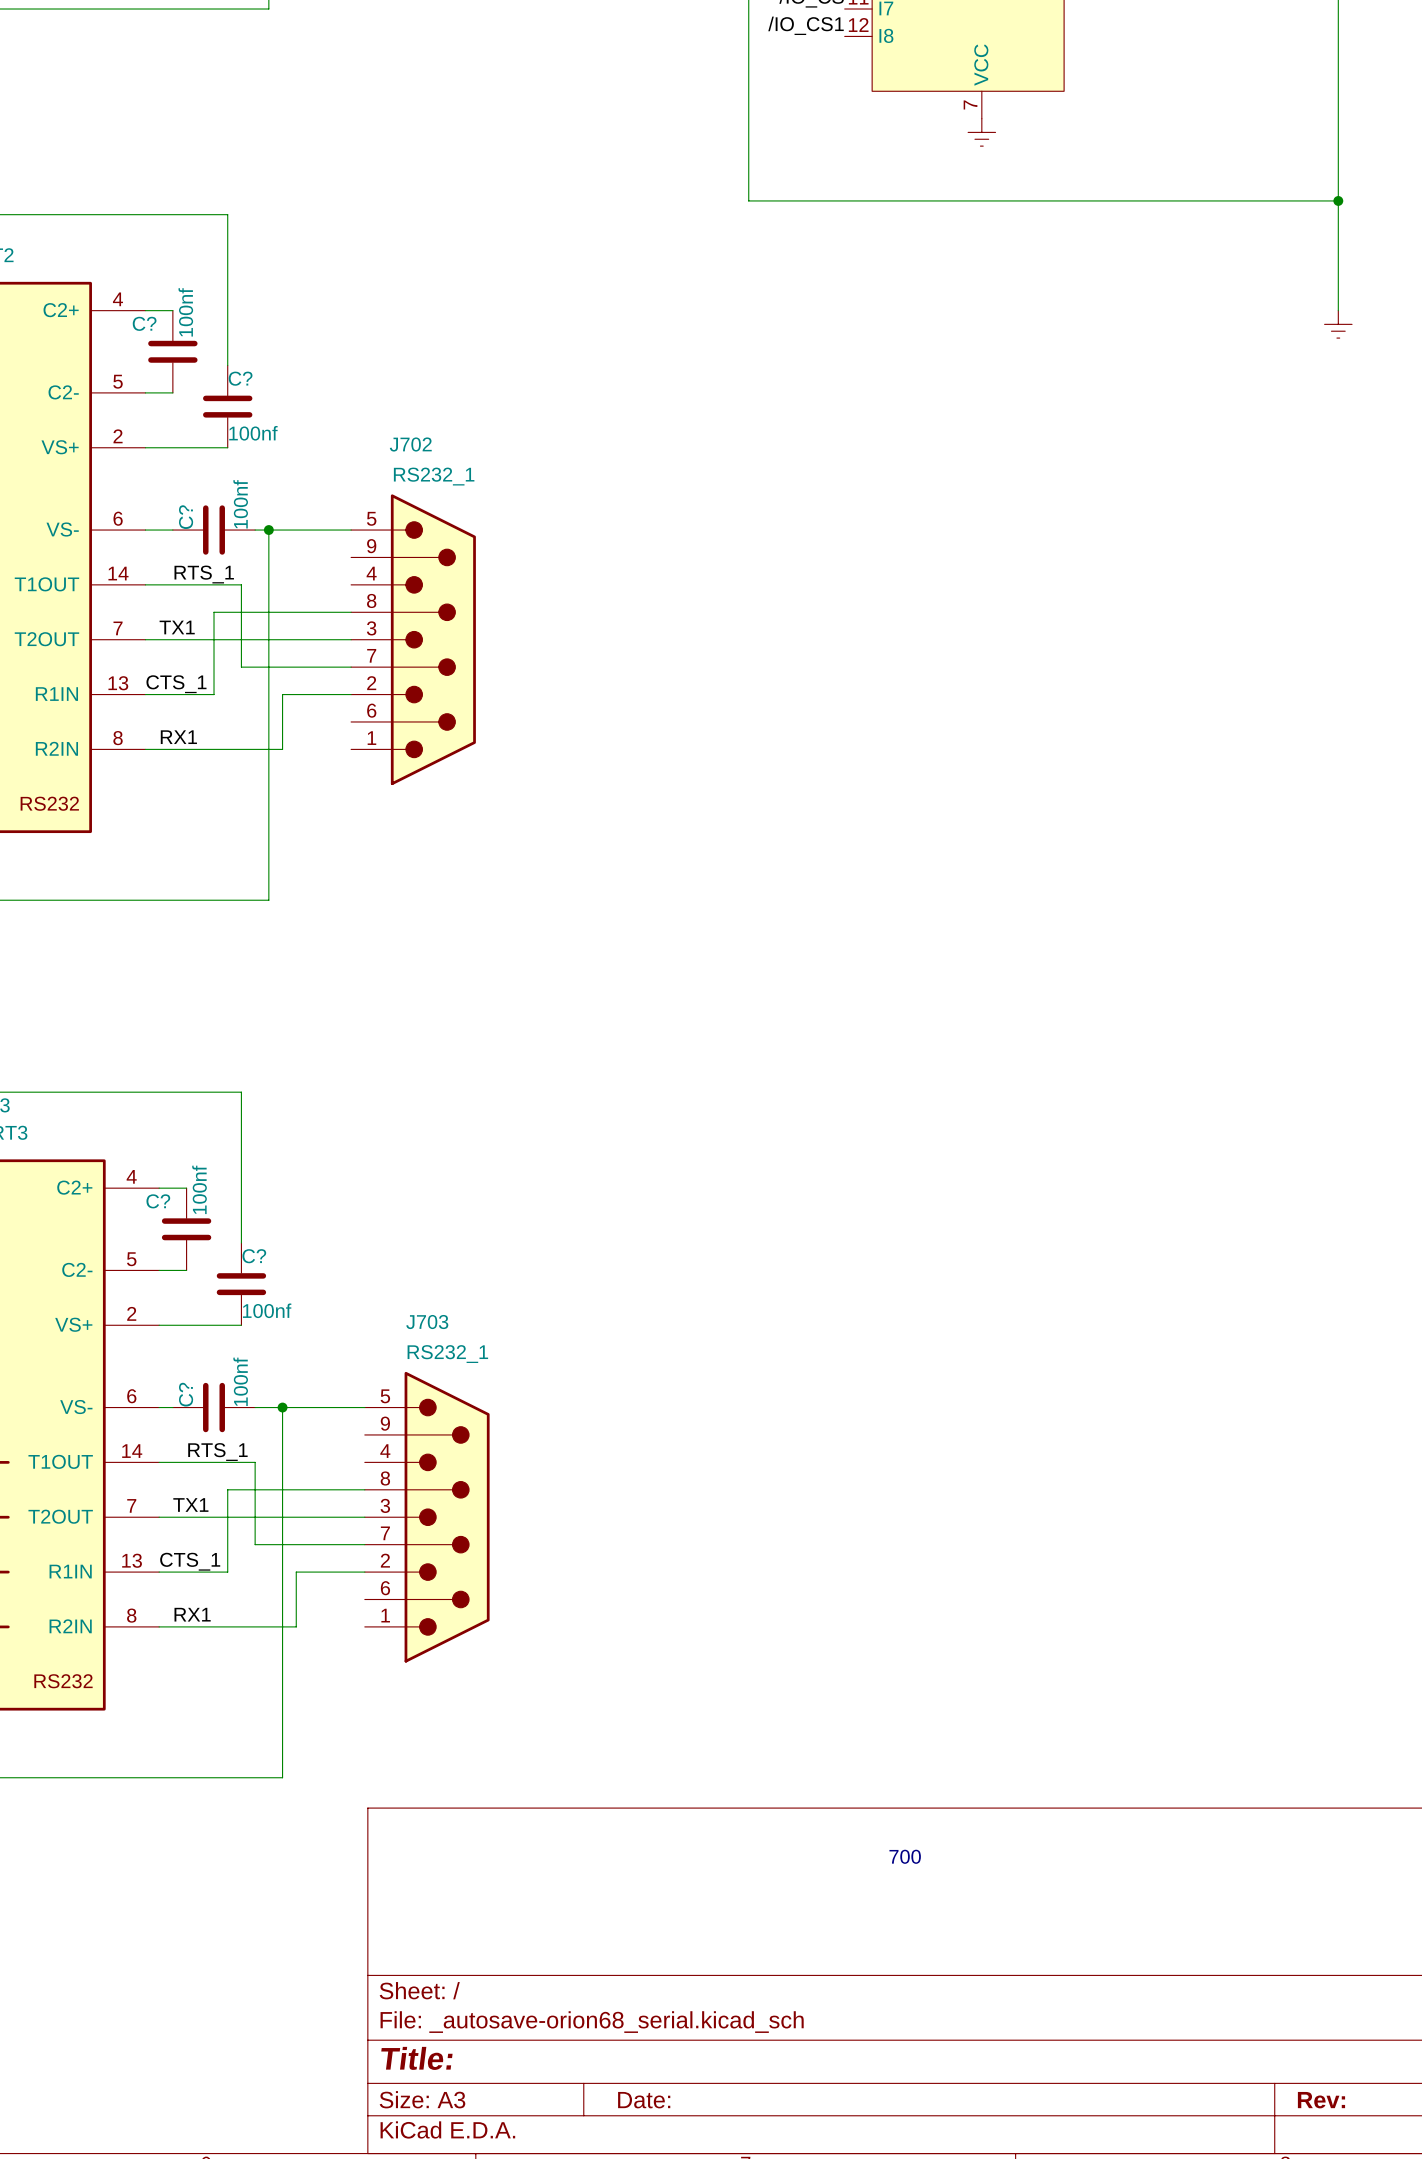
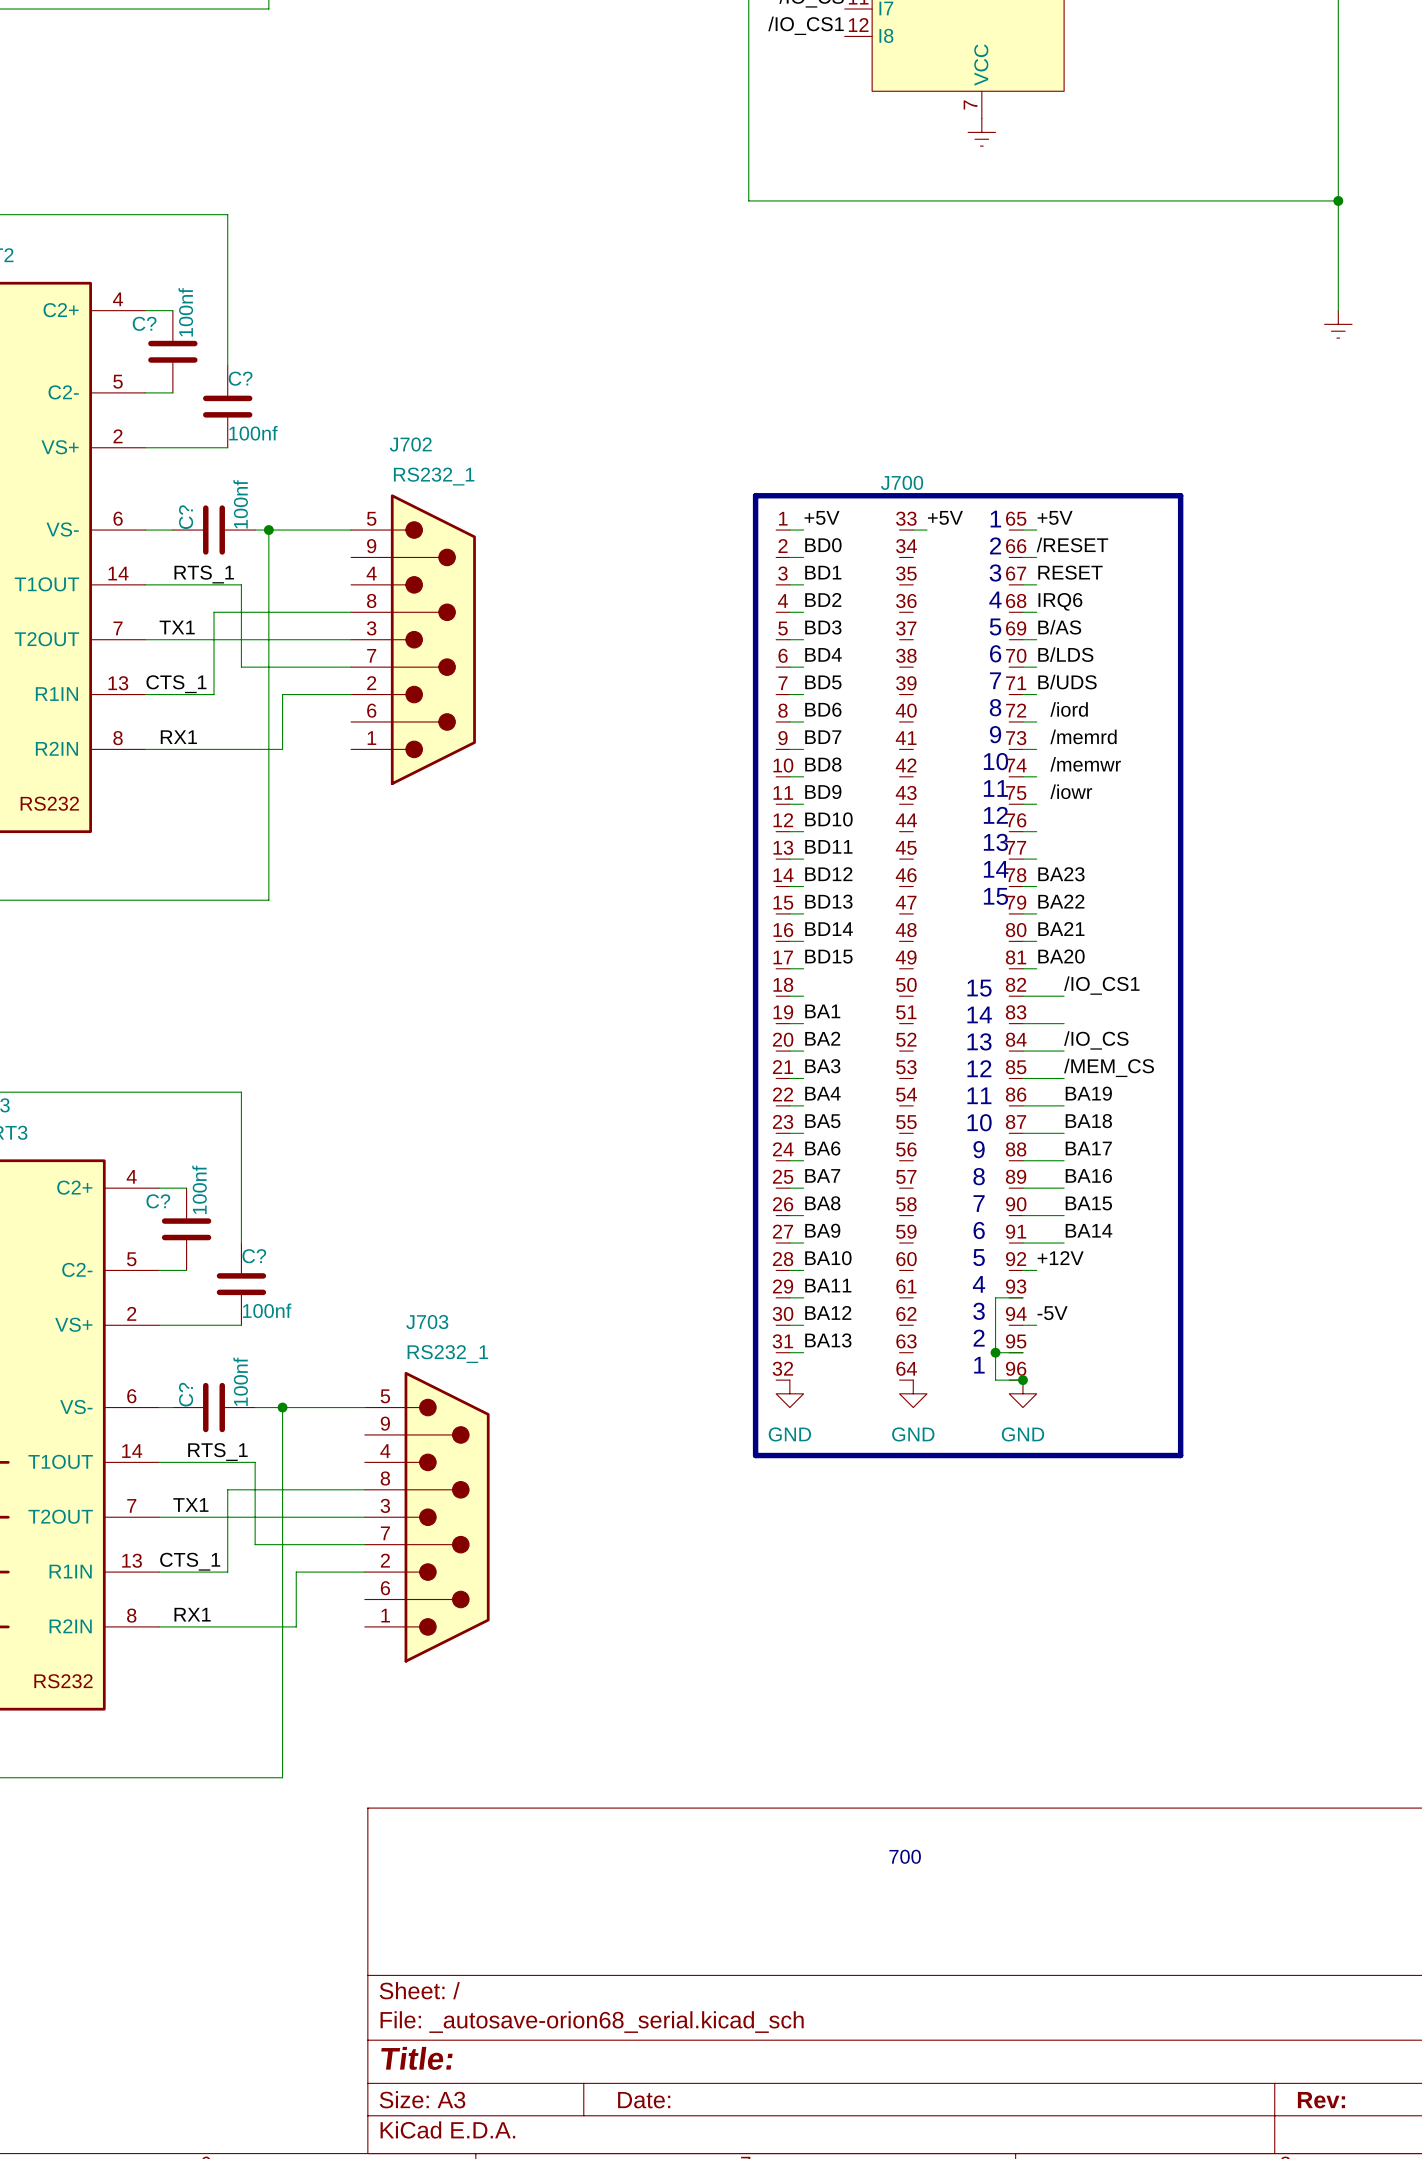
line: none -> (755, 495) (1180, 495) (1180, 1455) (755, 1455) (755, 495)
label: none -> +5V (822, 517)
label: none -> +5V (945, 517)
label: none -> +5V (1055, 517)
text: none -> 1 (995, 519)
wire: none -> (789, 530) (803, 530)
wire: none -> (913, 530) (926, 530)
wire: none -> (1022, 530) (1036, 530)
label: none -> /RESET (1072, 544)
label: none -> BD0 (823, 545)
text: none -> 2 (995, 545)
wire: none -> (789, 557) (803, 557)
wire: none -> (1022, 557) (1036, 557)
label: none -> BD1 (823, 572)
text: none -> 3 (995, 572)
label: none -> RESET (1070, 572)
wire: none -> (789, 584) (803, 584)
wire: none -> (1022, 584) (1036, 584)
label: none -> BD2 (823, 599)
text: none -> 4 (995, 599)
label: none -> IRQ6 (1060, 601)
wire: none -> (789, 612) (803, 612)
wire: none -> (1022, 612) (1036, 612)
text: none -> 5 (995, 626)
label: none -> BD3 (823, 627)
label: none -> B/AS (1059, 627)
wire: none -> (789, 639) (803, 639)
wire: none -> (1022, 639) (1036, 639)
text: none -> 6 (995, 653)
label: none -> BD4 (823, 654)
label: none -> B/LDS (1065, 654)
wire: none -> (789, 667) (803, 667)
wire: none -> (1022, 667) (1036, 667)
text: none -> 7 (995, 680)
label: none -> BD5 (823, 682)
label: none -> B/UDS (1067, 682)
wire: none -> (789, 694) (803, 694)
wire: none -> (1022, 694) (1036, 694)
text: none -> 8 (995, 707)
label: none -> BD6 (823, 709)
label: none -> /iord (1069, 709)
wire: none -> (789, 721) (803, 721)
wire: none -> (1022, 721) (1036, 721)
text: none -> 9 (995, 734)
label: none -> /memrd (1083, 736)
label: none -> BD7 (823, 737)
wire: none -> (789, 749) (803, 749)
wire: none -> (1022, 749) (1036, 749)
text: none -> 10 (995, 761)
label: none -> BD8 (823, 764)
label: none -> /memwr (1085, 764)
wire: none -> (789, 776) (803, 776)
wire: none -> (1022, 776) (1036, 776)
text: none -> 11 (995, 788)
label: none -> /iowr (1071, 791)
label: none -> BD9 (823, 792)
wire: none -> (789, 804) (803, 804)
wire: none -> (1022, 804) (1036, 804)
text: none -> 12 (995, 815)
label: none -> BD10 (828, 819)
wire: none -> (789, 831) (803, 831)
wire: none -> (1022, 831) (1036, 831)
text: none -> 13 (995, 842)
label: none -> BD11 (828, 846)
wire: none -> (789, 859) (803, 859)
wire: none -> (1022, 859) (1036, 859)
text: none -> 14 (996, 869)
label: none -> BD12 (828, 874)
label: none -> BA23 (1061, 874)
wire: none -> (789, 886) (803, 886)
wire: none -> (1022, 886) (1036, 886)
text: none -> 15 (995, 896)
label: none -> BD13 (828, 901)
label: none -> BA22 (1061, 901)
wire: none -> (789, 913) (803, 913)
wire: none -> (1022, 913) (1036, 913)
label: none -> BD14 (829, 929)
label: none -> BA21 (1061, 929)
wire: none -> (789, 941) (803, 941)
wire: none -> (1022, 941) (1036, 941)
J700: none -> (899, 955)
label: none -> BD15 (828, 956)
label: none -> BA20 (1061, 956)
wire: none -> (789, 968) (803, 968)
wire: none -> (1022, 968) (1036, 968)
label: none -> /IO_CS1 (1101, 985)
text: none -> 15 (979, 988)
wire: none -> (789, 996) (803, 996)
wire: none -> (1022, 996) (1064, 996)
label: none -> BA1 (822, 1011)
text: none -> 14 (979, 1014)
wire: none -> (789, 1023) (803, 1023)
wire: none -> (1022, 1023) (1064, 1023)
label: none -> BA2 (822, 1038)
label: none -> /IO_CS (1096, 1040)
text: none -> 13 (979, 1041)
wire: none -> (789, 1051) (803, 1051)
wire: none -> (1022, 1051) (1064, 1051)
label: none -> BA3 (822, 1066)
label: none -> /MEM_CS (1109, 1067)
text: none -> 12 (979, 1068)
wire: none -> (789, 1078) (803, 1078)
wire: none -> (1022, 1078) (1064, 1078)
label: none -> BA4 (822, 1093)
label: none -> BA19 (1088, 1093)
text: none -> 11 (979, 1095)
wire: none -> (789, 1105) (803, 1105)
wire: none -> (1022, 1105) (1064, 1105)
label: none -> BA5 (822, 1121)
label: none -> BA18 (1088, 1121)
text: none -> 10 (979, 1122)
wire: none -> (789, 1133) (803, 1133)
wire: none -> (1022, 1133) (1064, 1133)
label: none -> BA6 (822, 1148)
label: none -> BA17 (1088, 1148)
text: none -> 9 (979, 1149)
wire: none -> (789, 1160) (803, 1160)
wire: none -> (1022, 1160) (1064, 1160)
label: none -> BA7 (822, 1175)
label: none -> BA16 (1088, 1175)
text: none -> 8 (979, 1176)
wire: none -> (789, 1188) (803, 1188)
wire: none -> (1022, 1188) (1064, 1188)
label: none -> BA8 (822, 1203)
text: none -> 7 (979, 1203)
label: none -> BA15 (1088, 1203)
wire: none -> (789, 1215) (803, 1215)
wire: none -> (1022, 1215) (1064, 1215)
label: none -> BA9 (822, 1230)
text: none -> 6 (979, 1230)
label: none -> BA14 (1089, 1230)
wire: none -> (789, 1243) (803, 1243)
wire: none -> (1022, 1243) (1064, 1243)
text: none -> 5 (979, 1257)
label: none -> BA10 (828, 1258)
label: none -> +12V (1060, 1258)
wire: none -> (789, 1270) (803, 1270)
wire: none -> (1022, 1270) (1036, 1270)
text: none -> 4 (979, 1284)
label: none -> BA11 (828, 1285)
wire: none -> (789, 1297) (803, 1297)
wire: none -> (1022, 1297) (995, 1297) (995, 1380) (1022, 1380)
text: none -> 3 (979, 1311)
label: none -> BA12 (828, 1312)
label: none -> -5V (1052, 1313)
wire: none -> (789, 1325) (803, 1325)
wire: none -> (1022, 1325) (1036, 1325)
text: none -> 2 (979, 1338)
label: none -> BA13 (828, 1340)
wire: none -> (789, 1352) (803, 1352)
wire: none -> (995, 1352) (1022, 1352)
junction: none -> (995, 1352)
text: none -> 1 (979, 1365)
junction: none -> (1022, 1380)
power symbol: none -> GND (789, 1393)
power symbol: none -> GND (913, 1393)
power symbol: none -> GND (1022, 1393)

